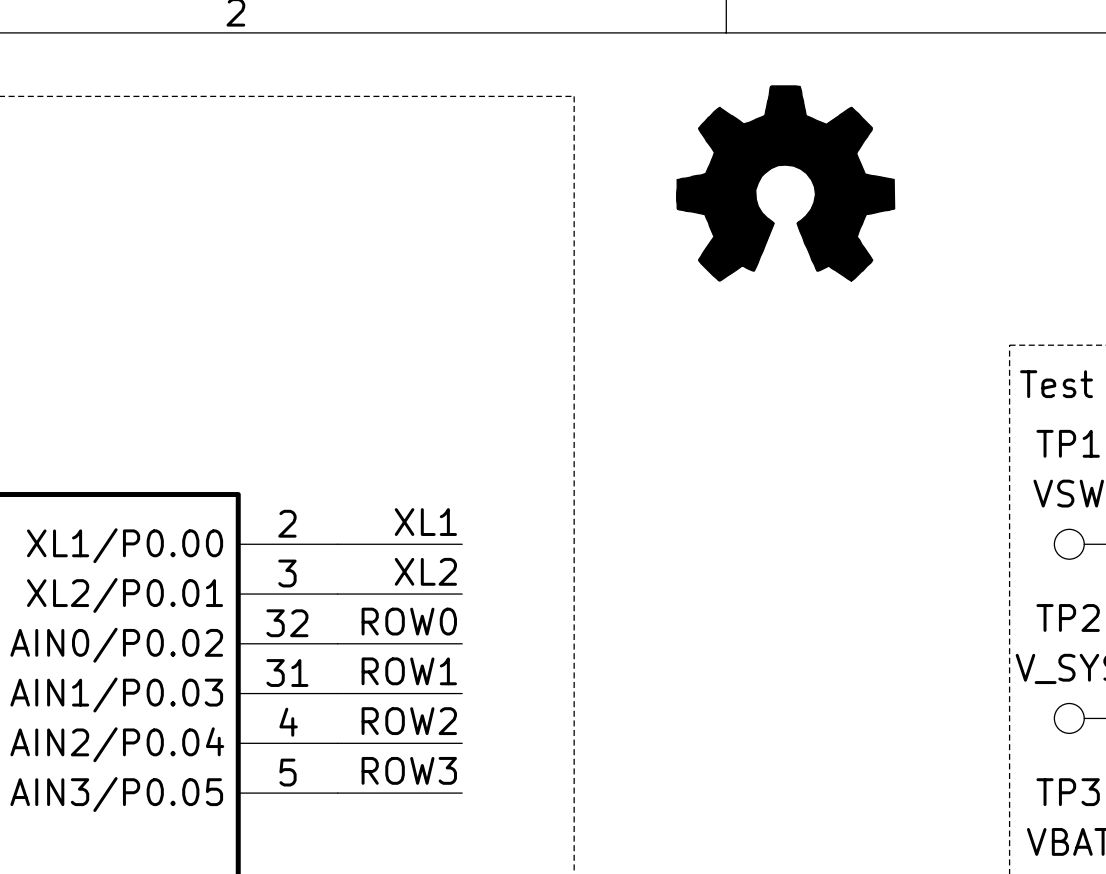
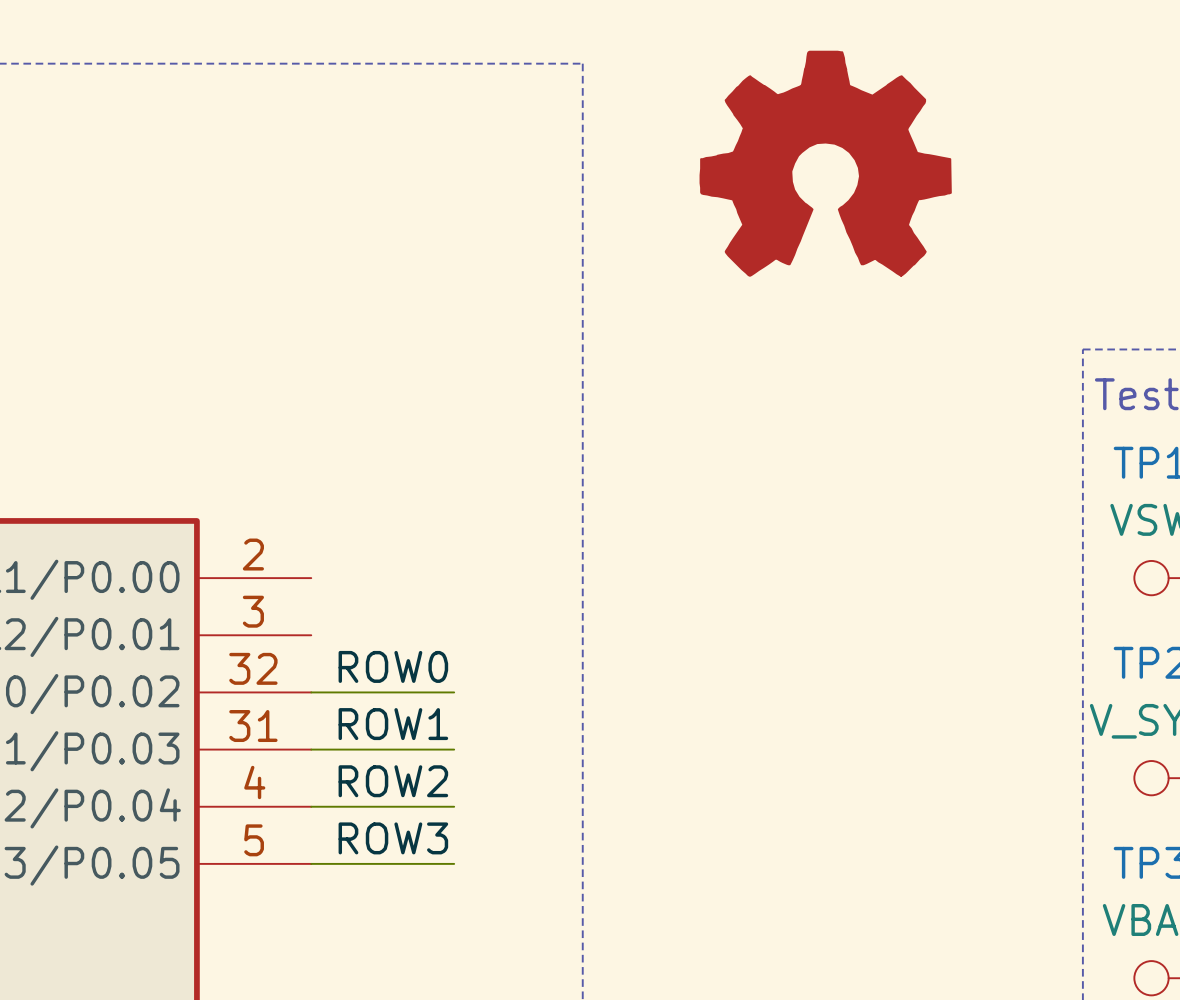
label: XL1 (425, 522) -> none
wire: (337, 544) (462, 544) -> none
label: XL2 (425, 571) -> none
wire: (337, 594) (462, 594) -> none

